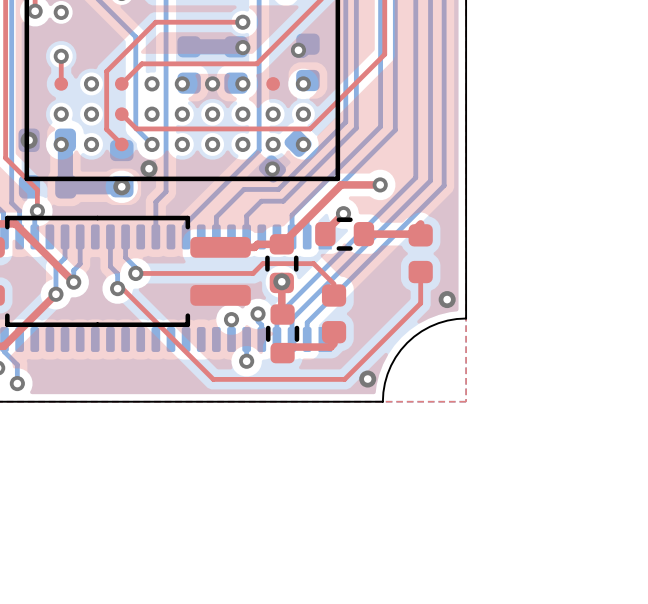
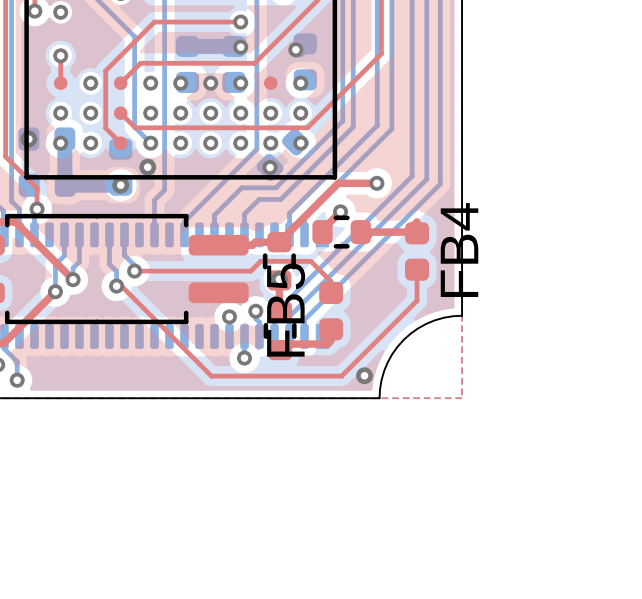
FB4 name: none -> FB4 (459, 250)
via: (447, 299) -> none
FB5 name: none -> FB5 (286, 310)

